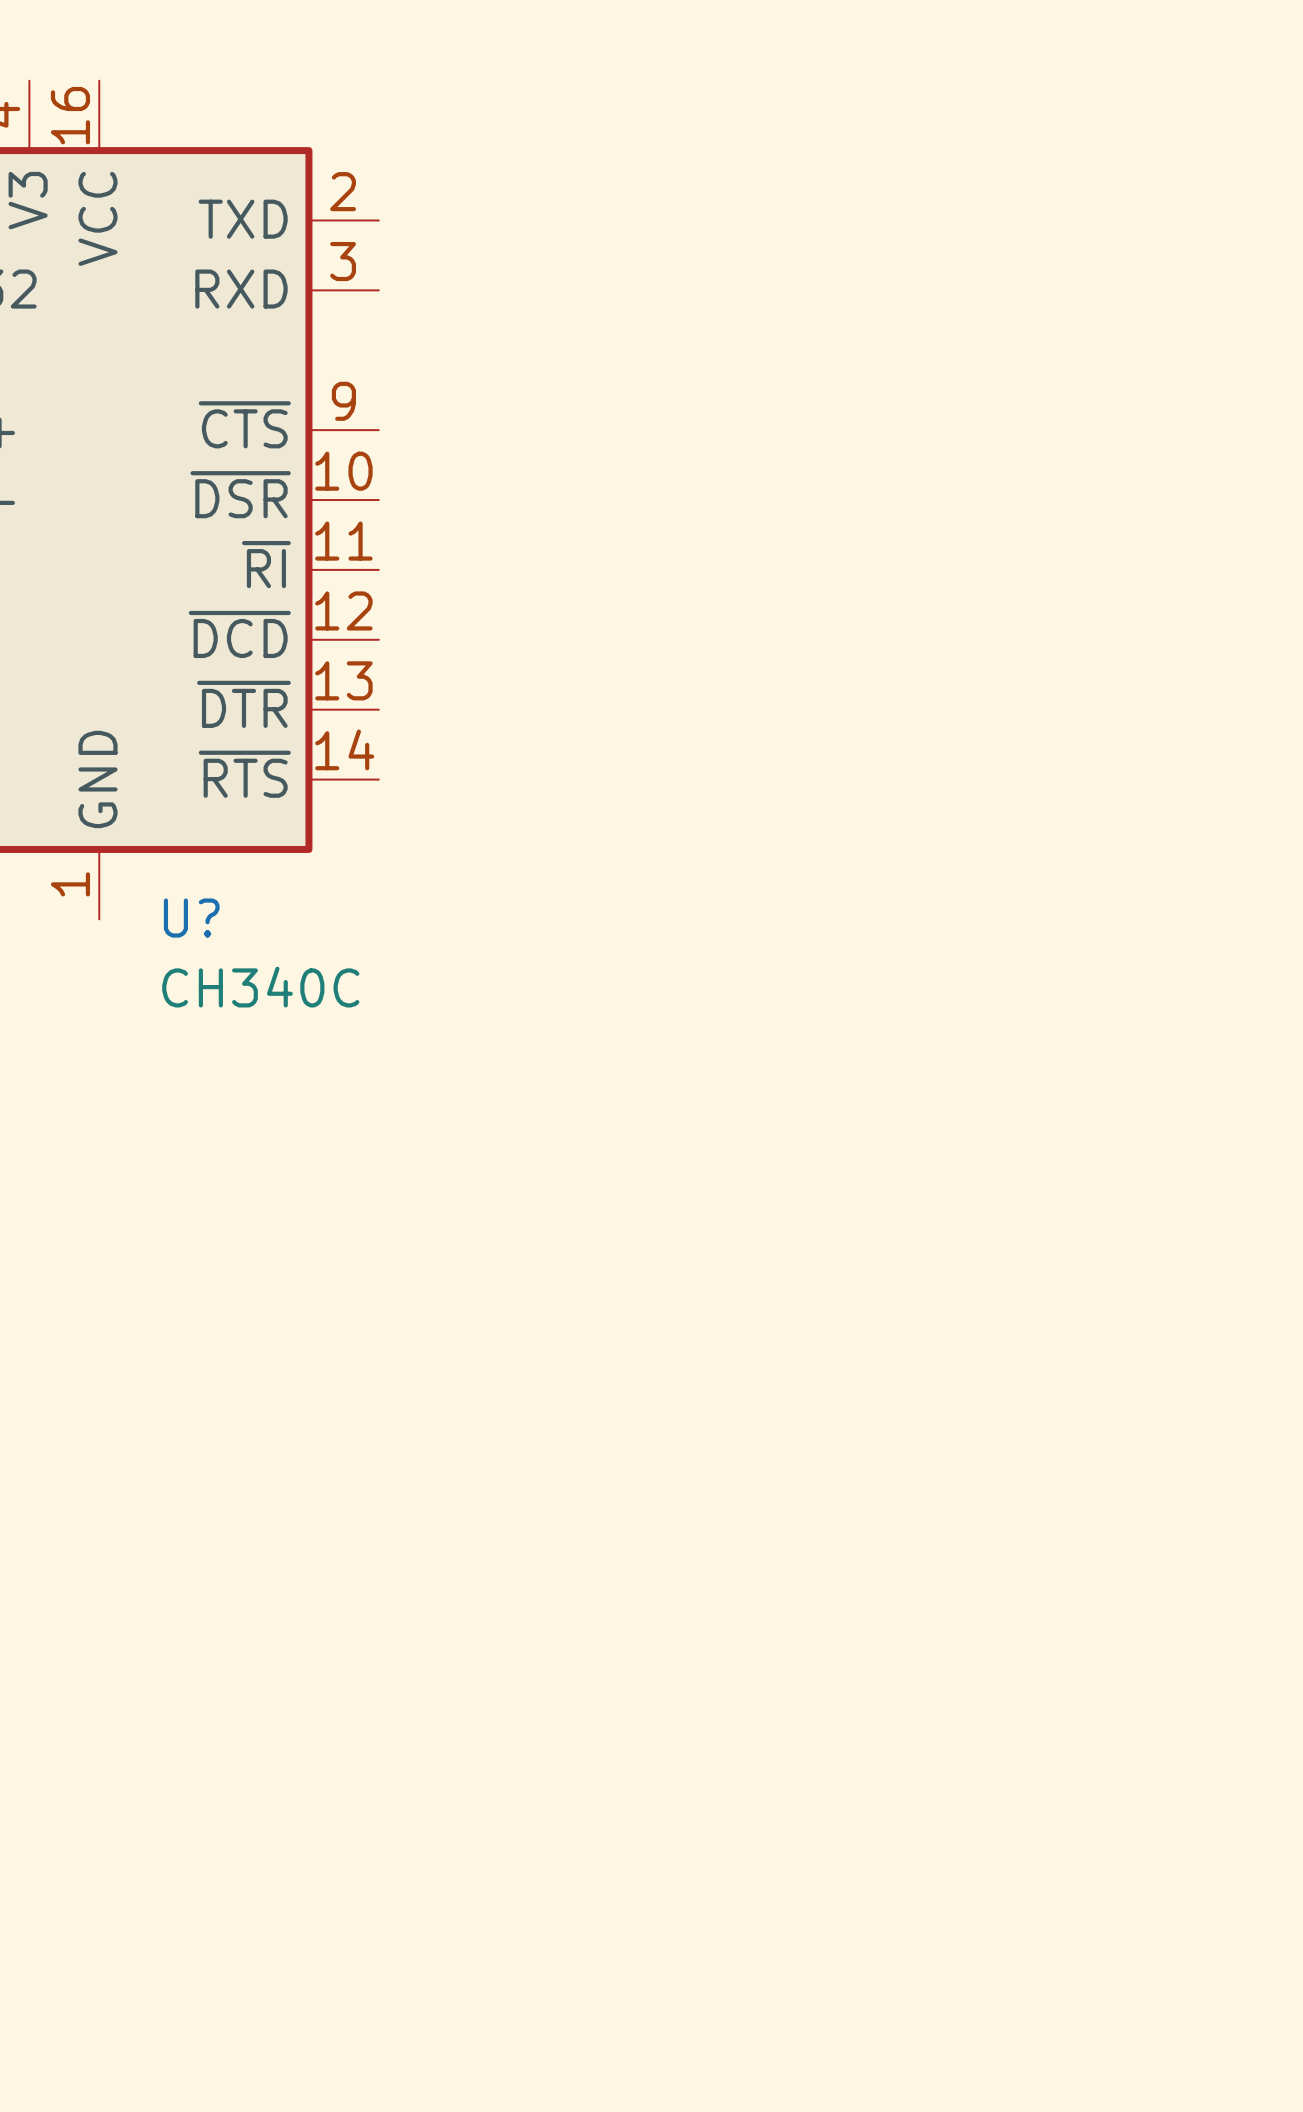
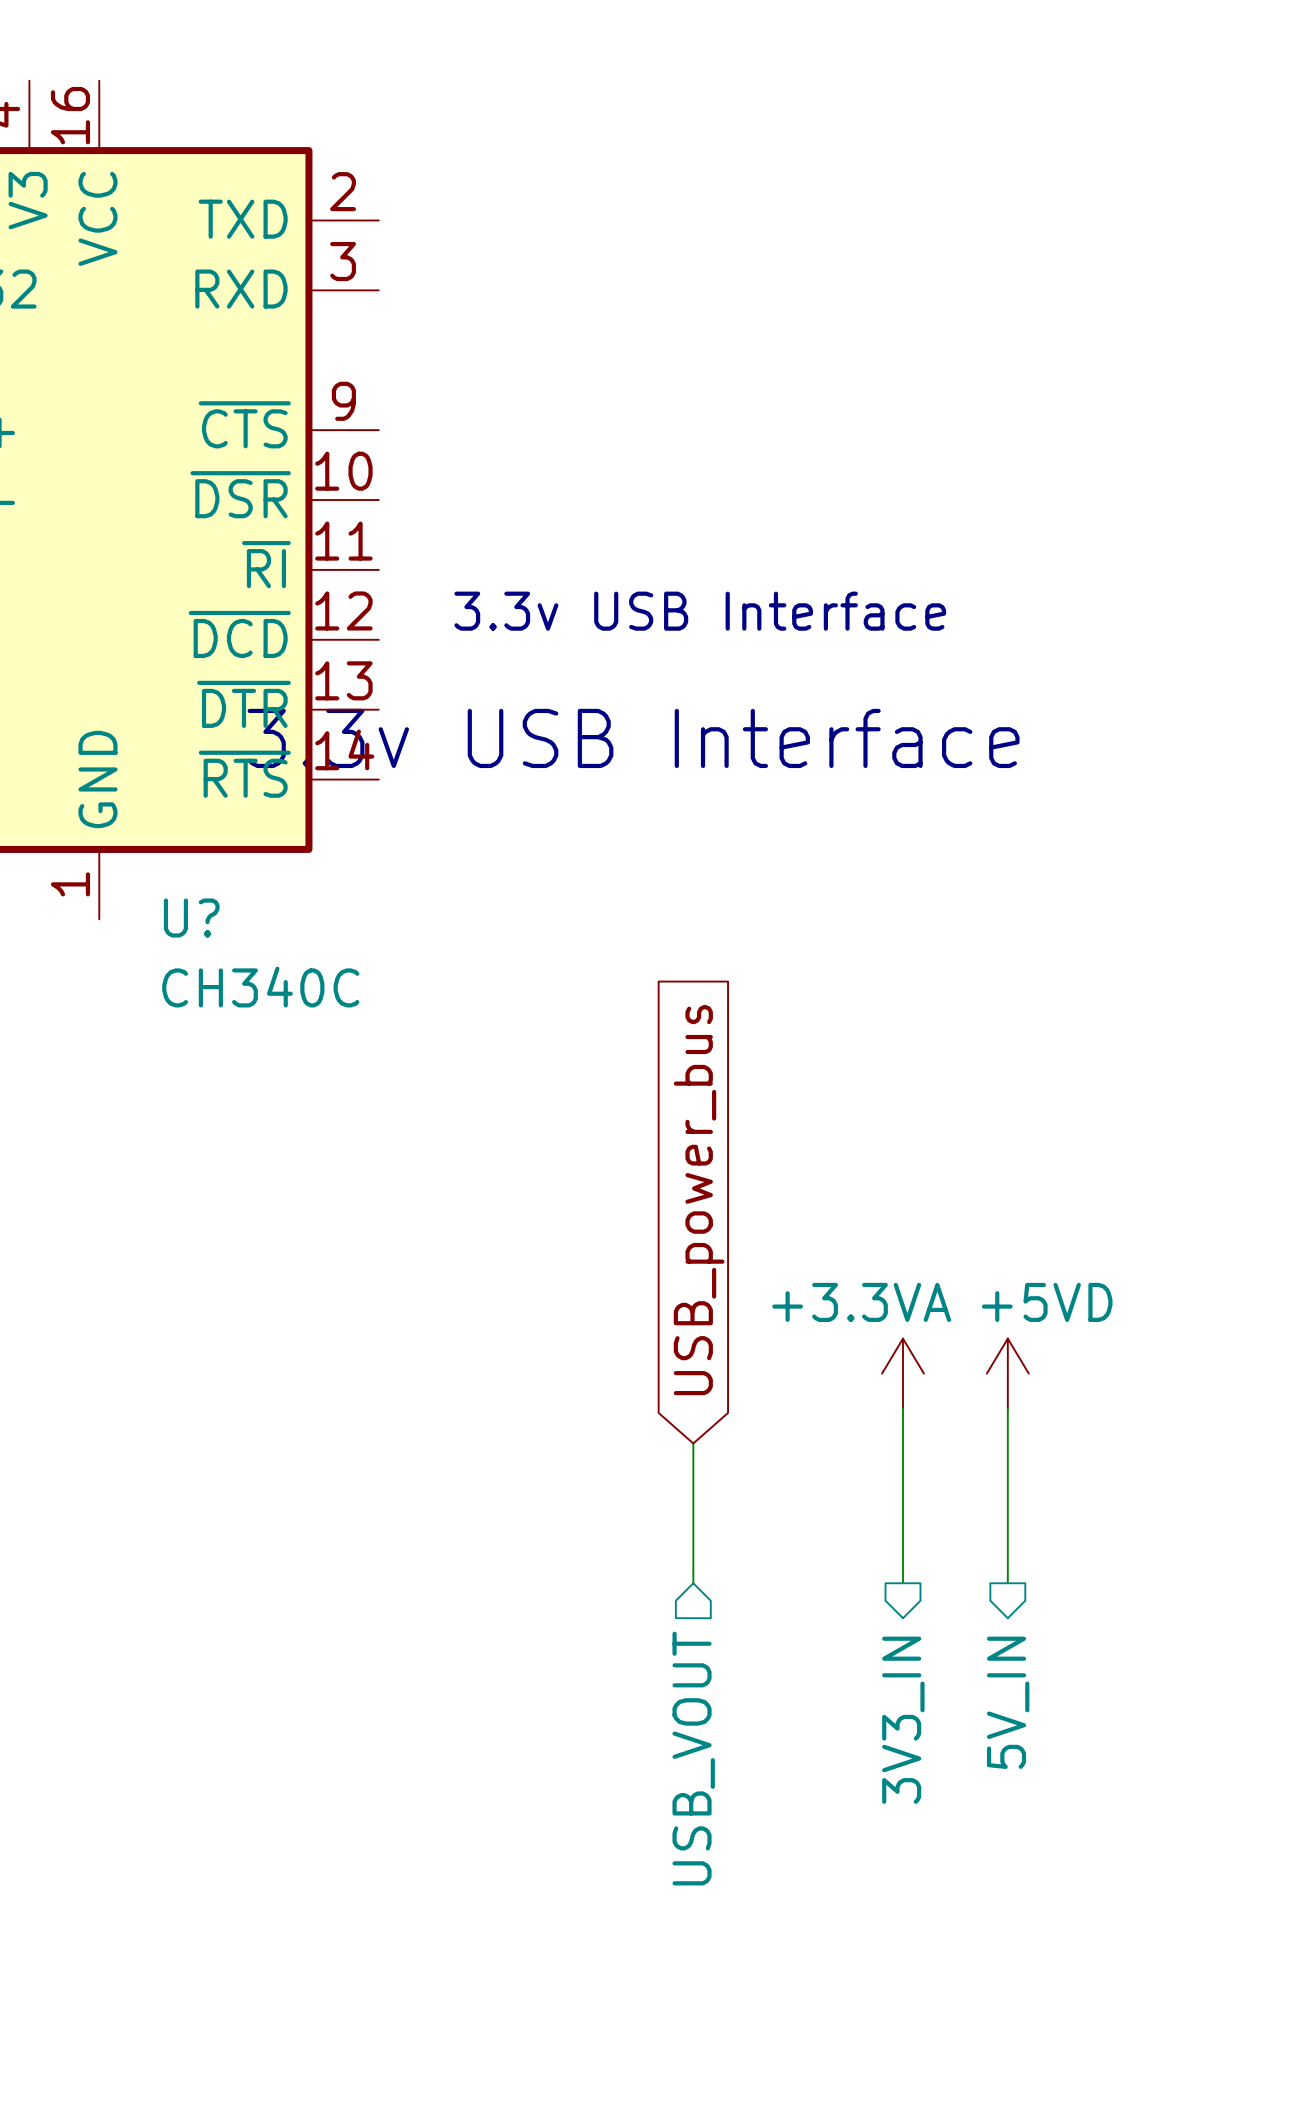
text: none -> 3.3v USB Interface (700, 611)
text: none -> 3.3v USB Interface (633, 738)
global label: none -> USB_power_bus (699, 1200)
power symbol: none -> +3.3VA (902, 1373)
power symbol: none -> +5VD (1007, 1373)
wire: none -> (902, 1408) (902, 1583)
wire: none -> (1007, 1408) (1007, 1583)
wire: none -> (693, 1443) (693, 1583)
sheet pin: none -> 5V_IN (1008, 1702)
sheet pin: none -> 3V3_IN (903, 1720)
sheet pin: none -> USB_VOUT (693, 1758)

